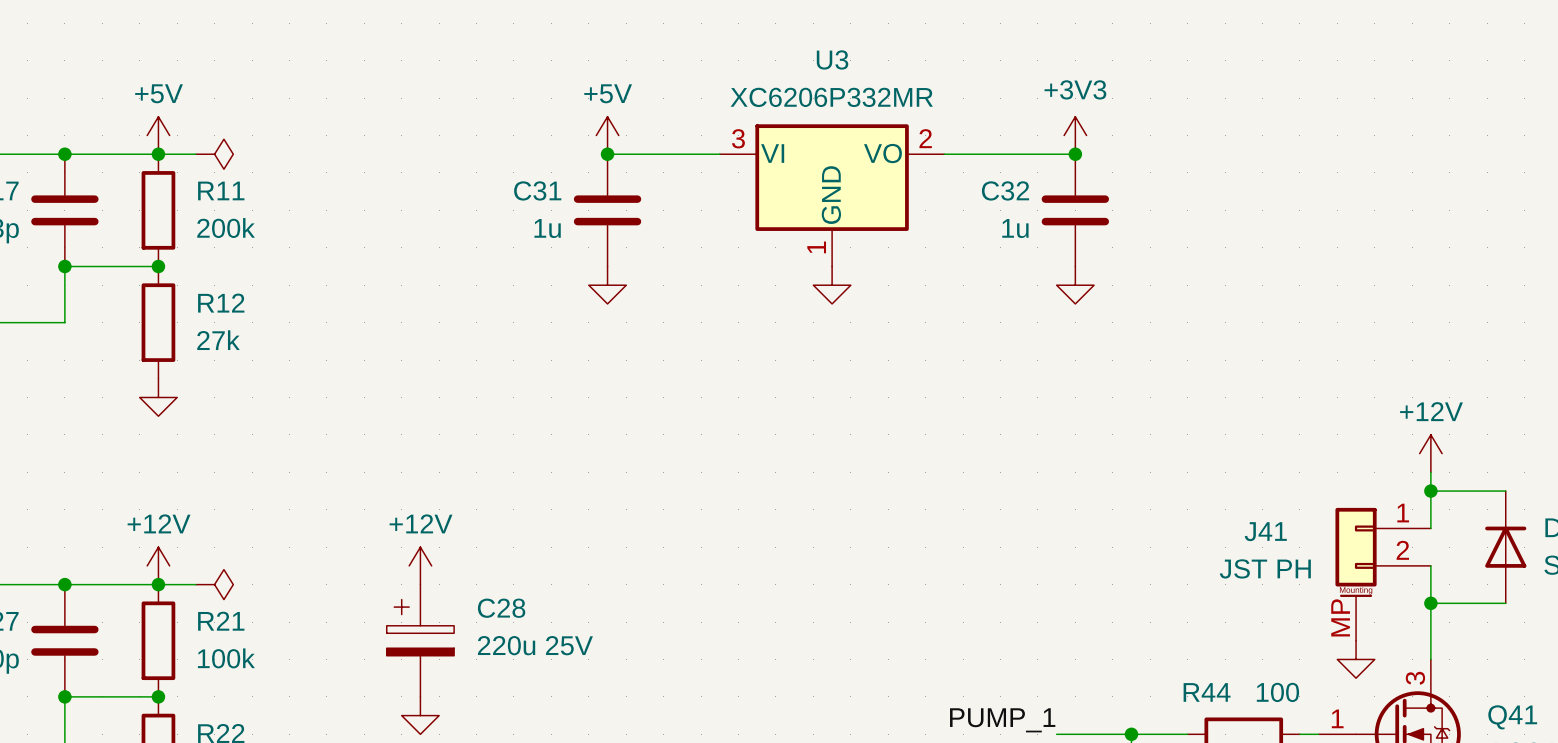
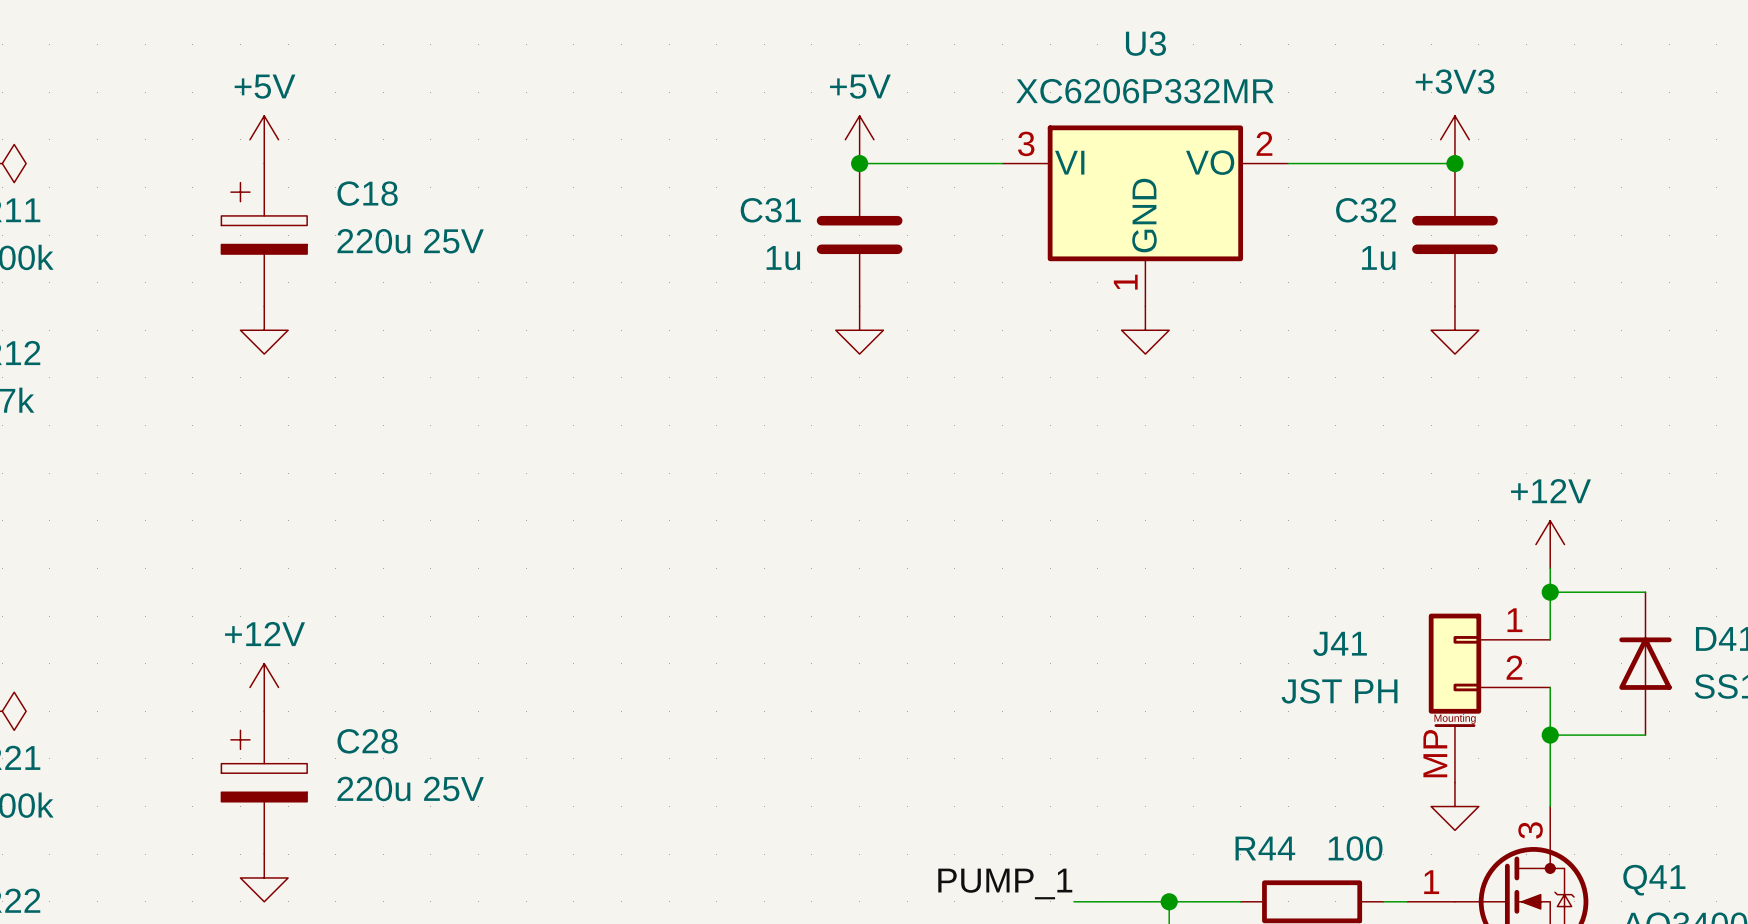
power symbol: none -> +5V (264, 139)
power symbol: +5V (607, 135) -> none
power symbol: none -> +5V (859, 139)
power symbol position: +3V3 (1075, 135) -> +3V3 (1454, 139)
wire: (607, 154) (719, 154) -> none
junction: (607, 154) -> none
junction: none -> (859, 163)
junction: (1075, 154) -> none
wire: none -> (1288, 163) (1454, 163)
junction: none -> (1454, 163)
U3 position: (832, 195) -> (1145, 215)
C18: none -> 220u 25V (264, 235)
C31 position: (607, 210) -> (859, 235)
C32 position: (1075, 210) -> (1454, 235)
power symbol: none -> (264, 330)
power symbol: (607, 285) -> none
power symbol position: (832, 285) -> (859, 330)
power symbol position: (1075, 285) -> (1145, 330)
power symbol: none -> (1454, 330)

